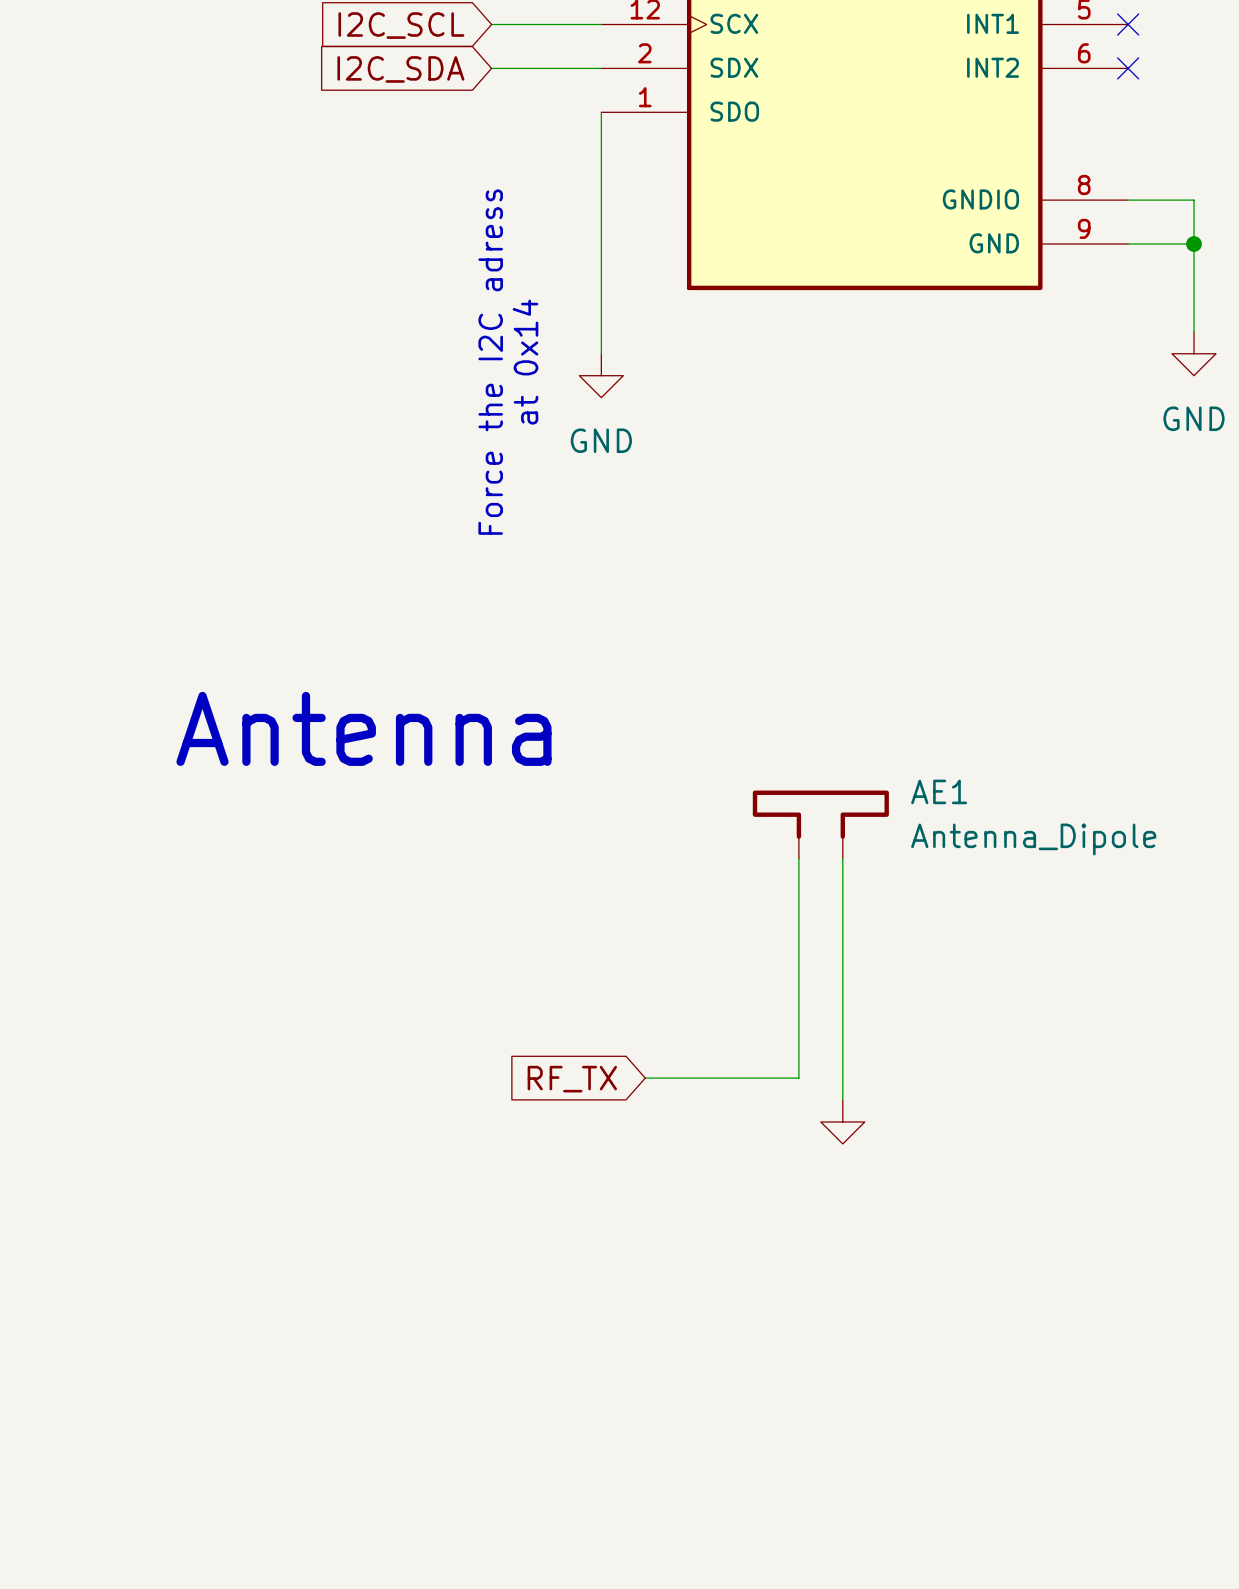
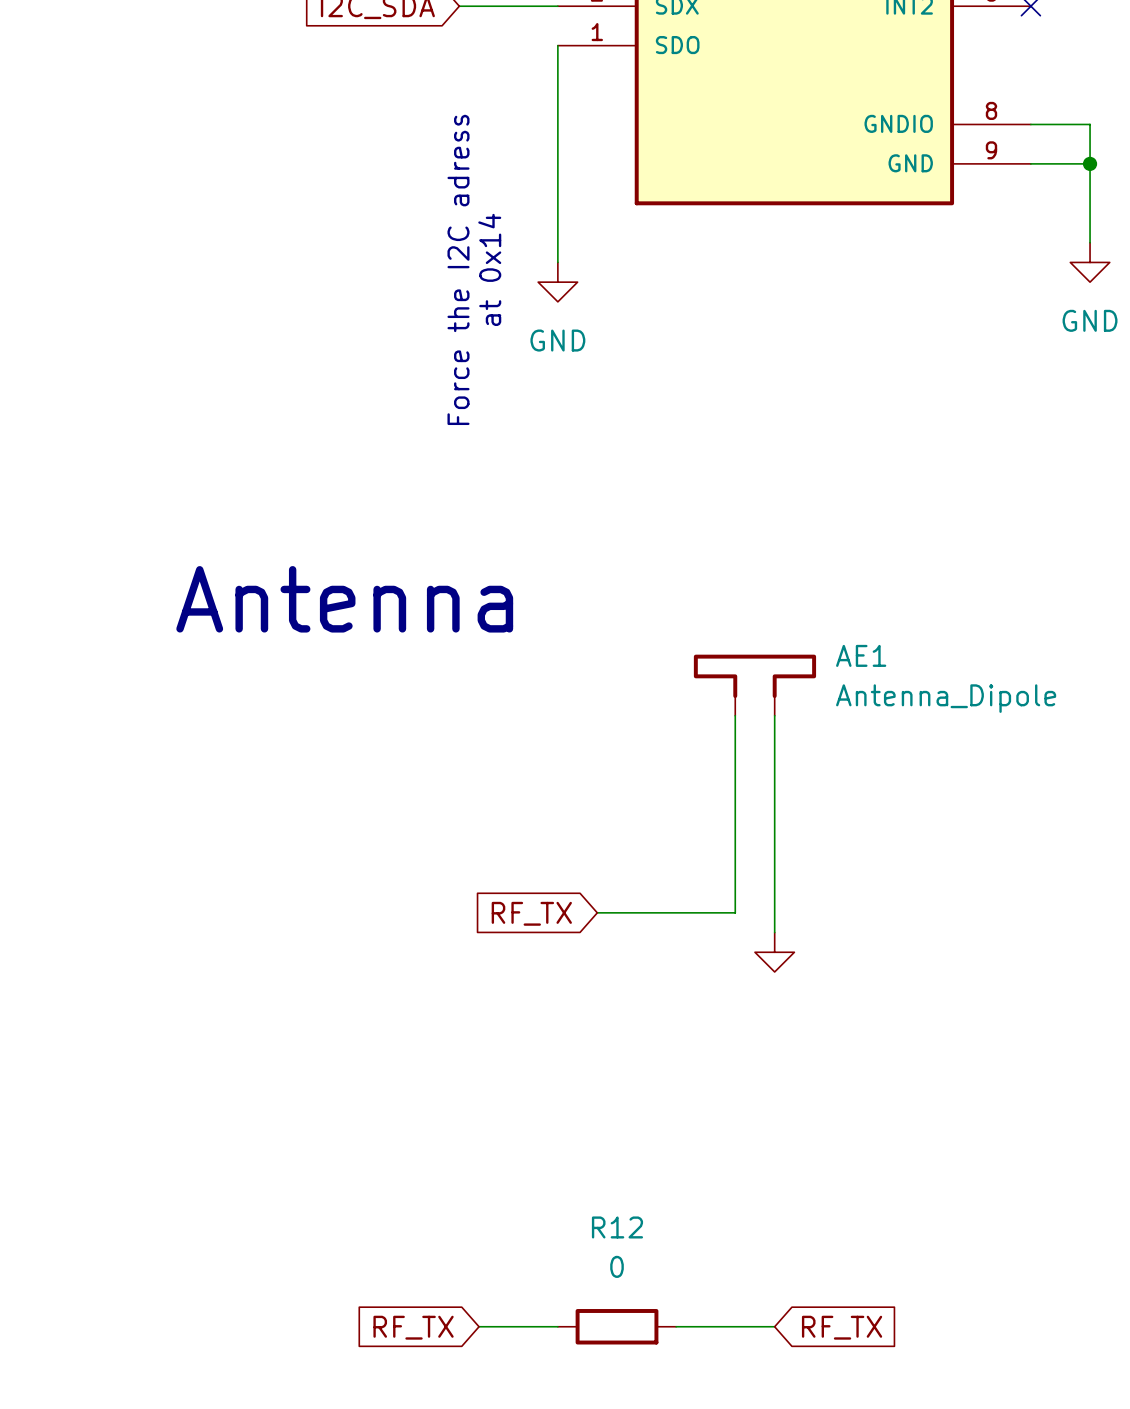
wire: none -> (479, 1326) (557, 1326)
R12: none -> 0 (617, 1326)
wire: none -> (676, 1326) (774, 1326)
global label: none -> RF_TX (413, 1327)
global label: none -> RF_TX (842, 1327)

